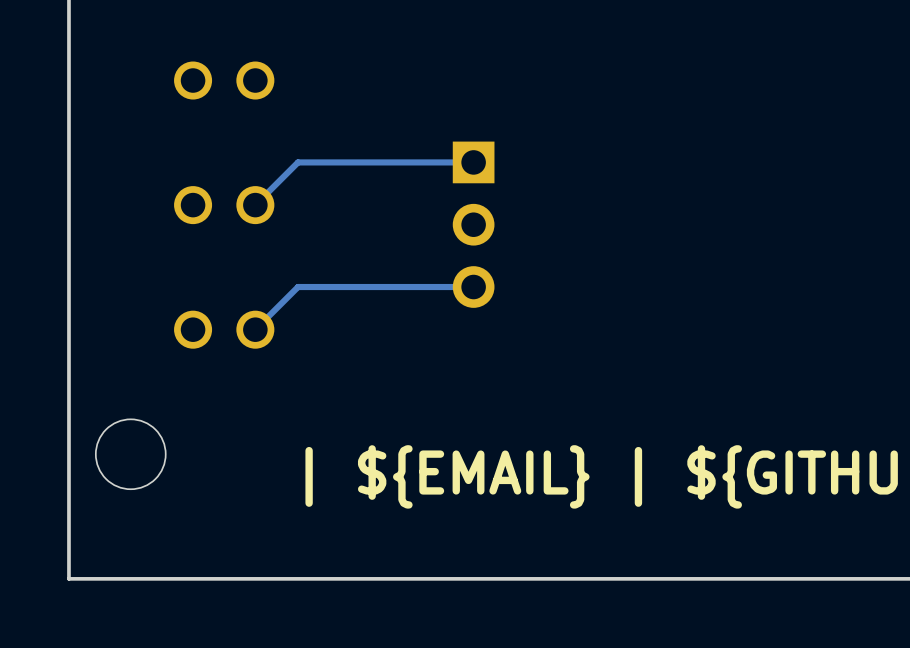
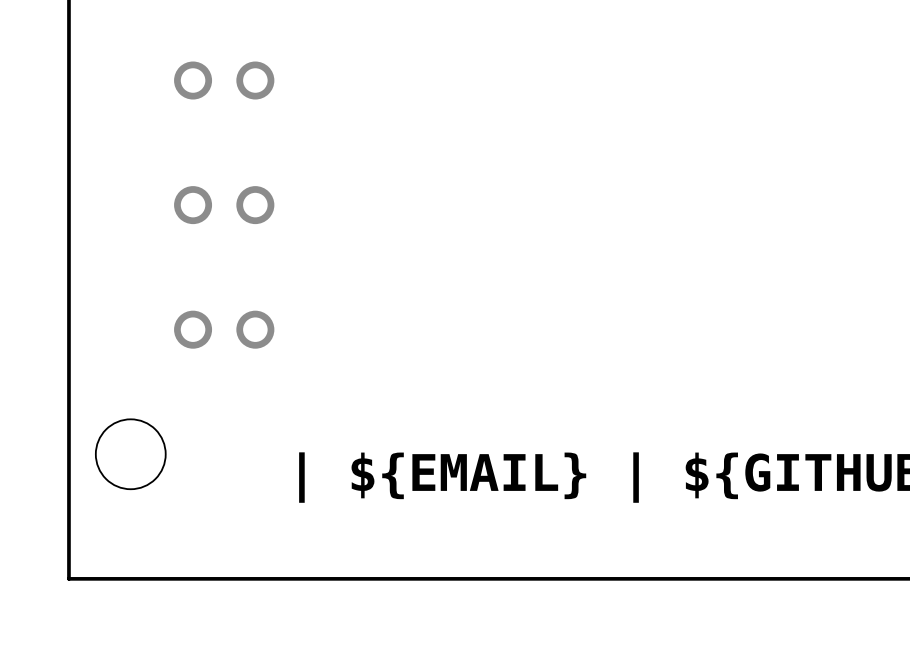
track: (473, 162) (298, 162) (255, 205) -> none
part: (473, 224) -> none
track: (473, 287) (298, 287) (255, 329) -> none

